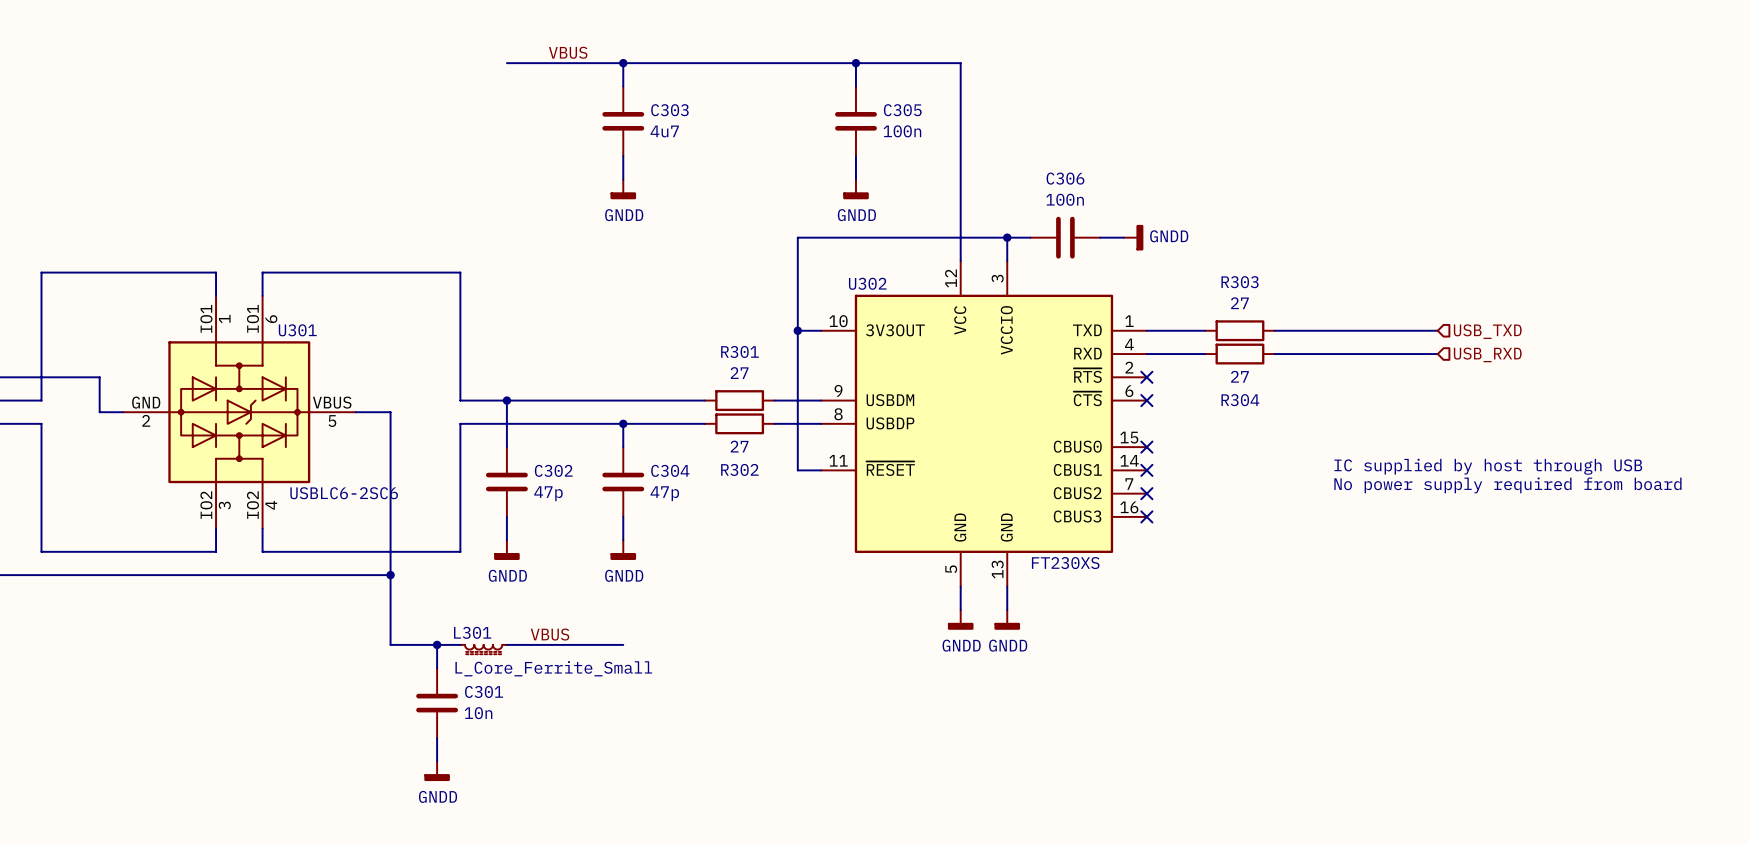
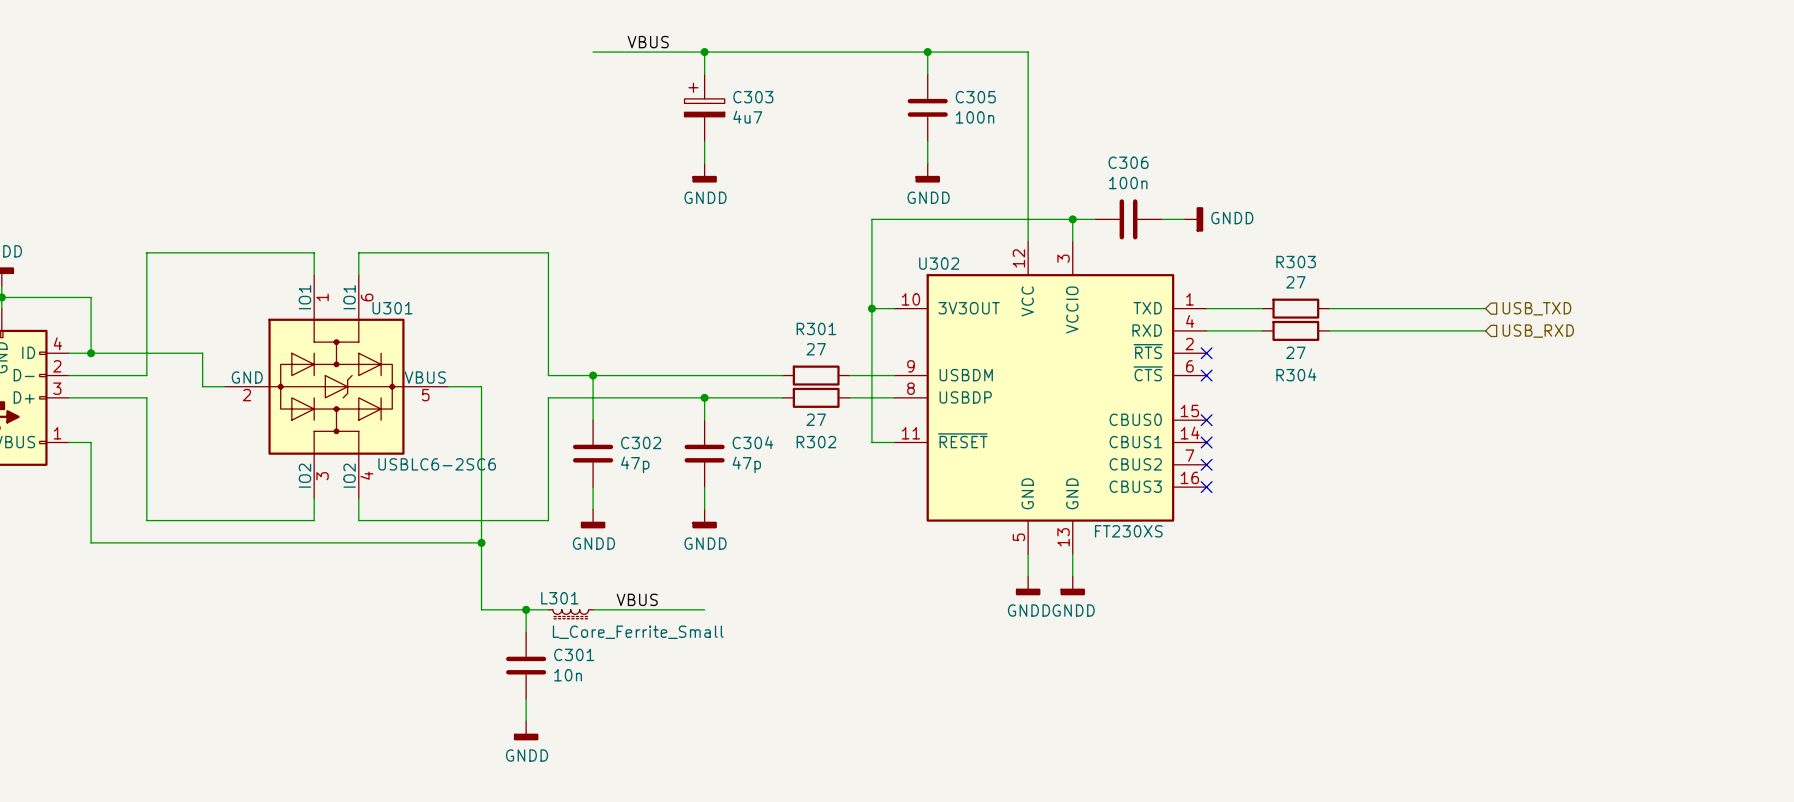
C303 symbol: [602, 86, 645, 157] -> [684, 74, 725, 142]
text: IC supplied by host through USB (1488, 466) -> none
text: No power supply required from board (1507, 485) -> none

